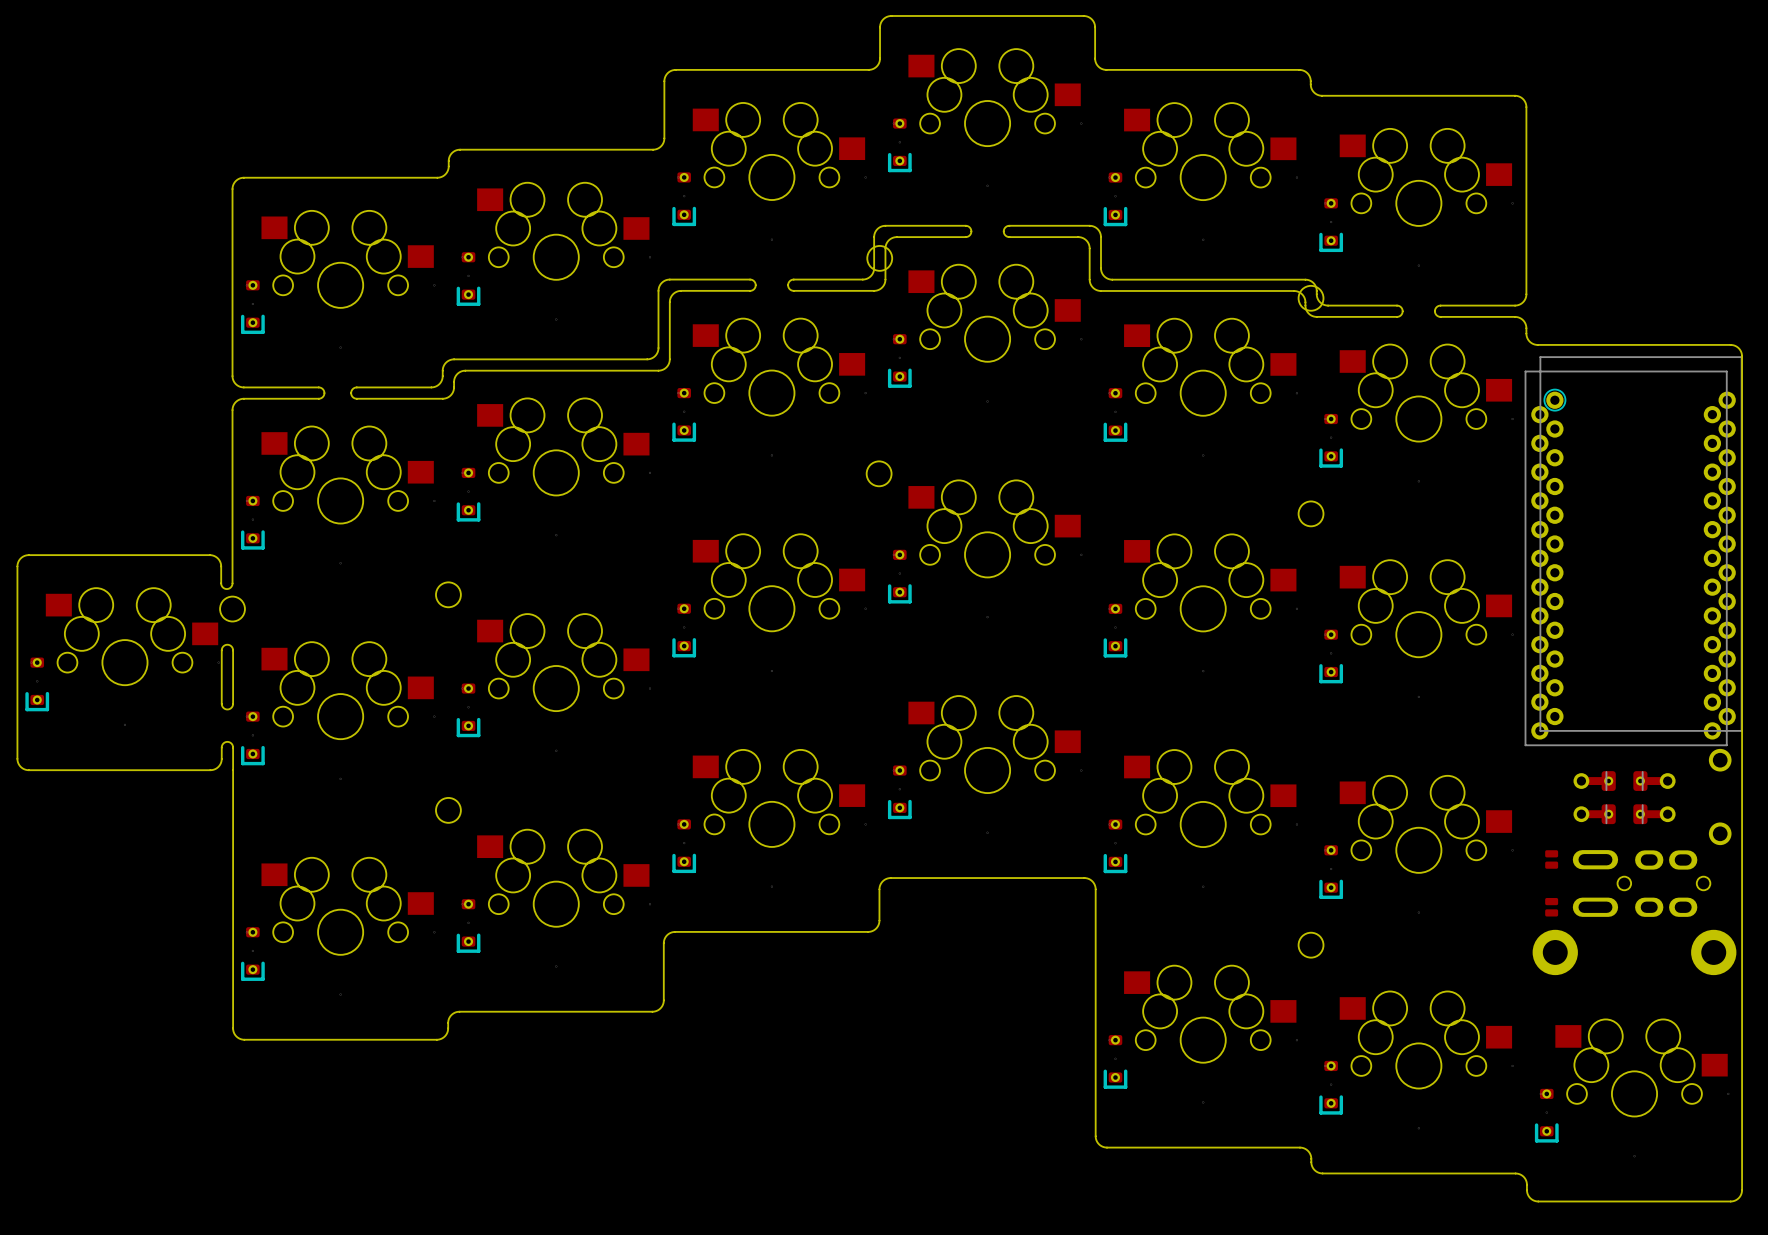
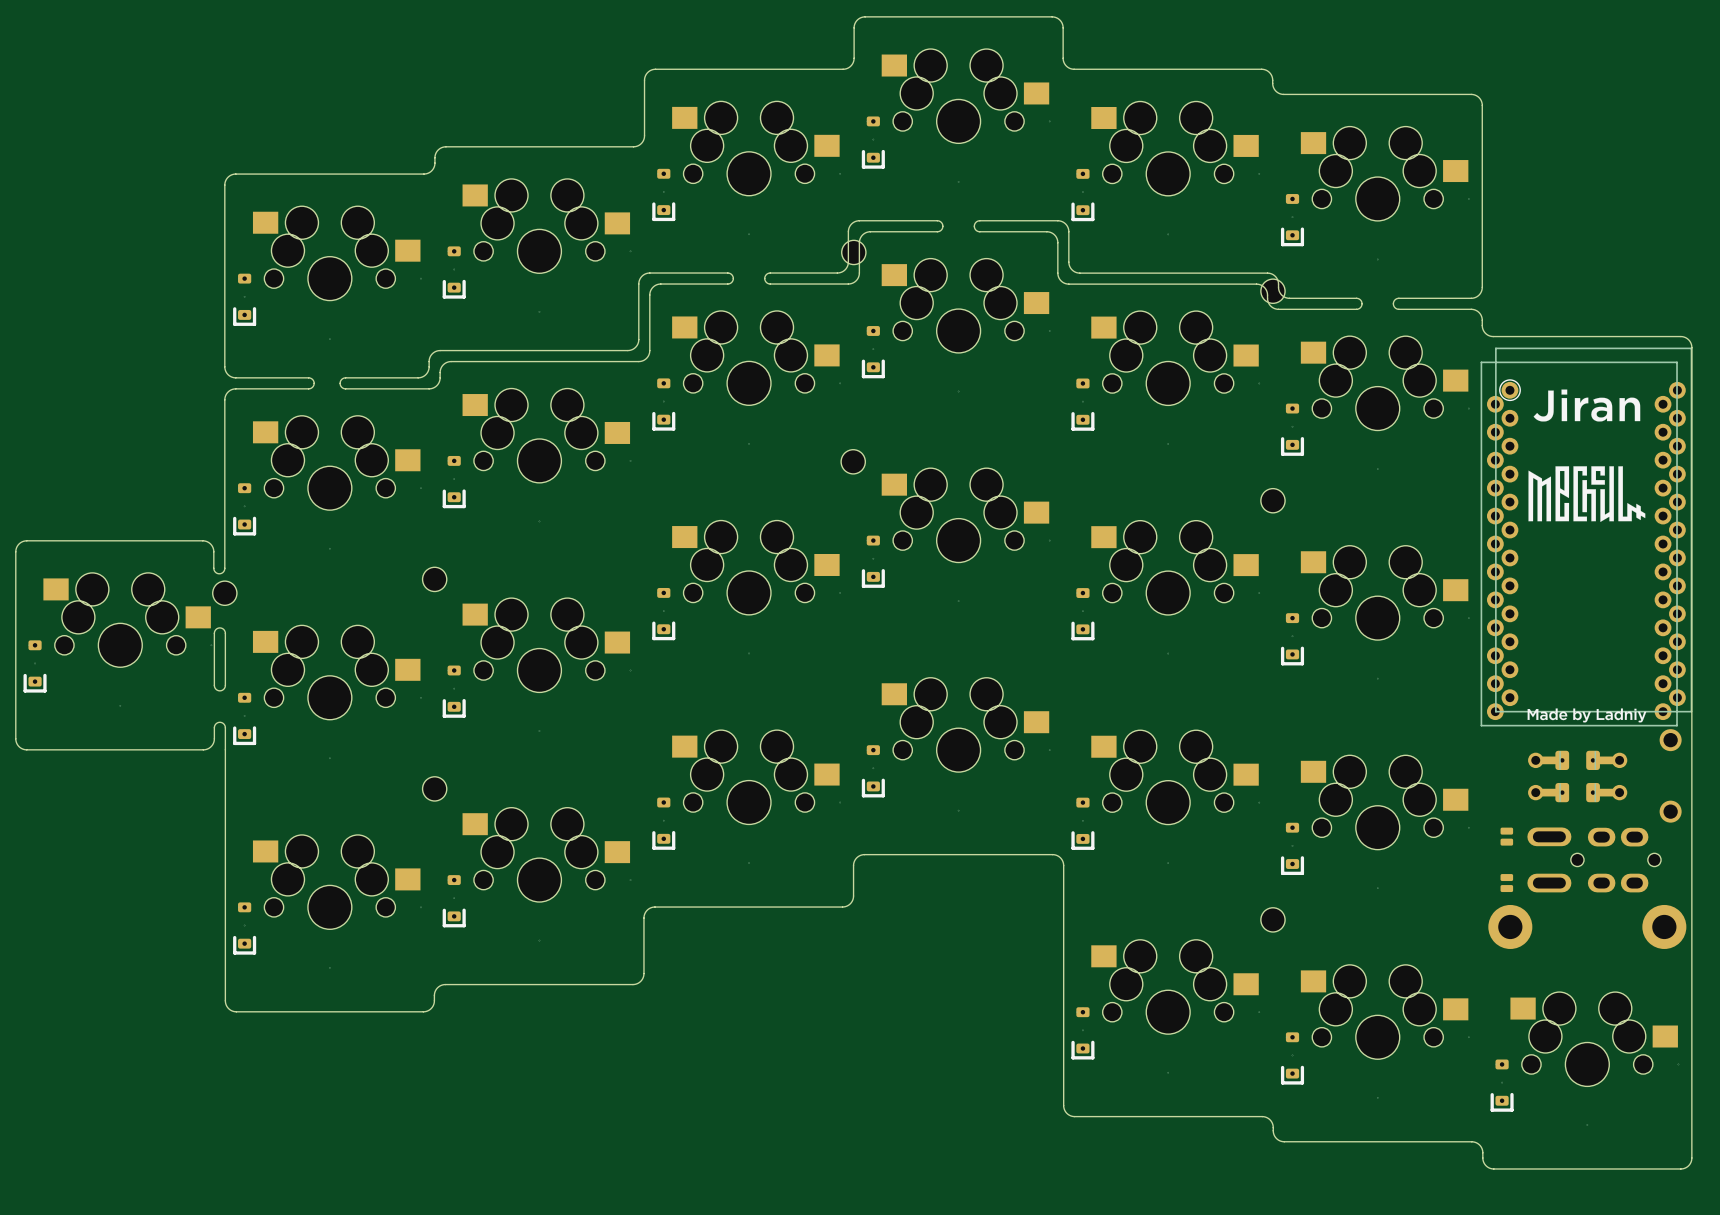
drawing: none -> [1527, 389, 1647, 723]

